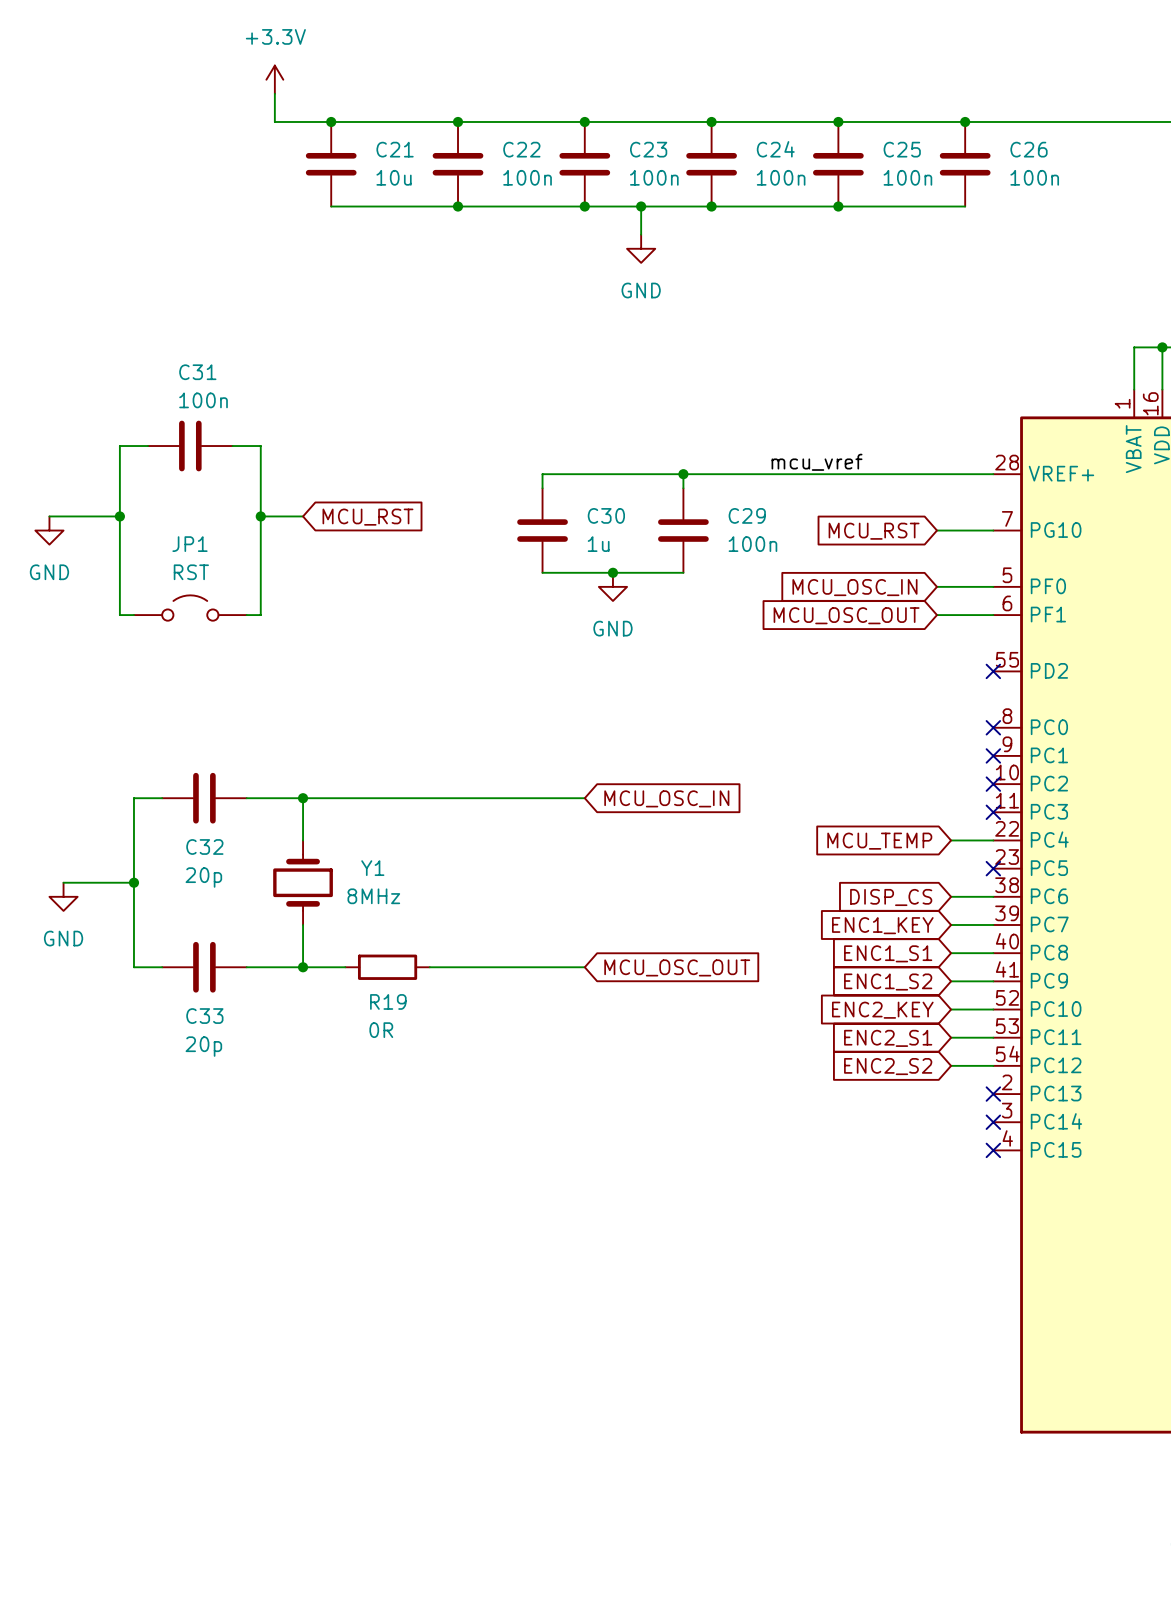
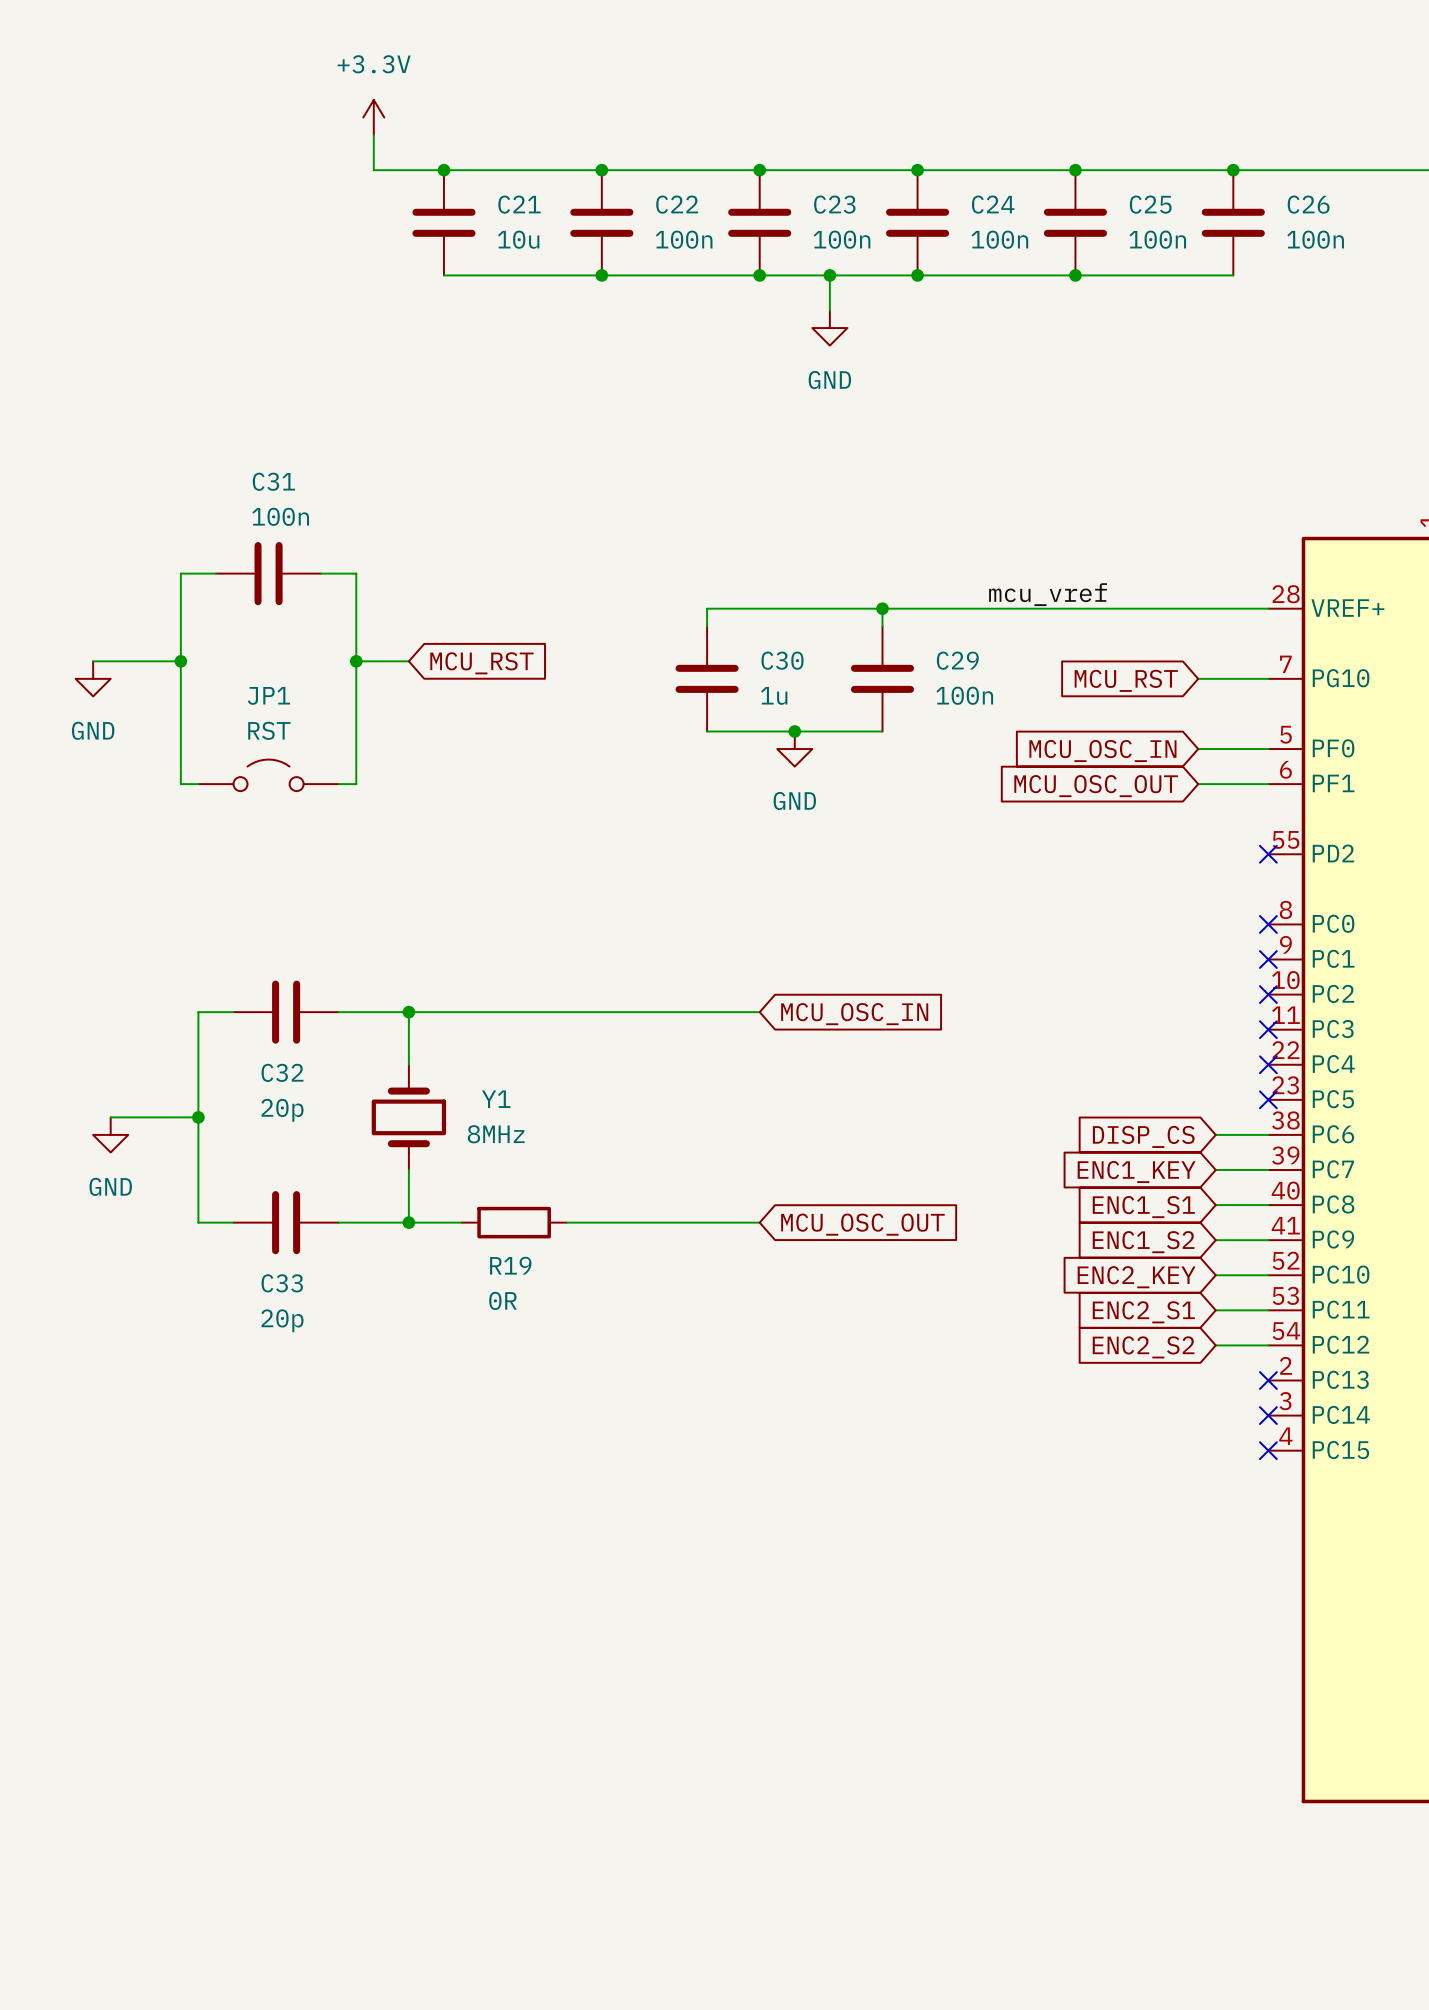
wire: (951, 840) (993, 840) -> none
no-connect mark: none -> (1268, 1064)
global label: MCU_TEMP (879, 841) -> none

